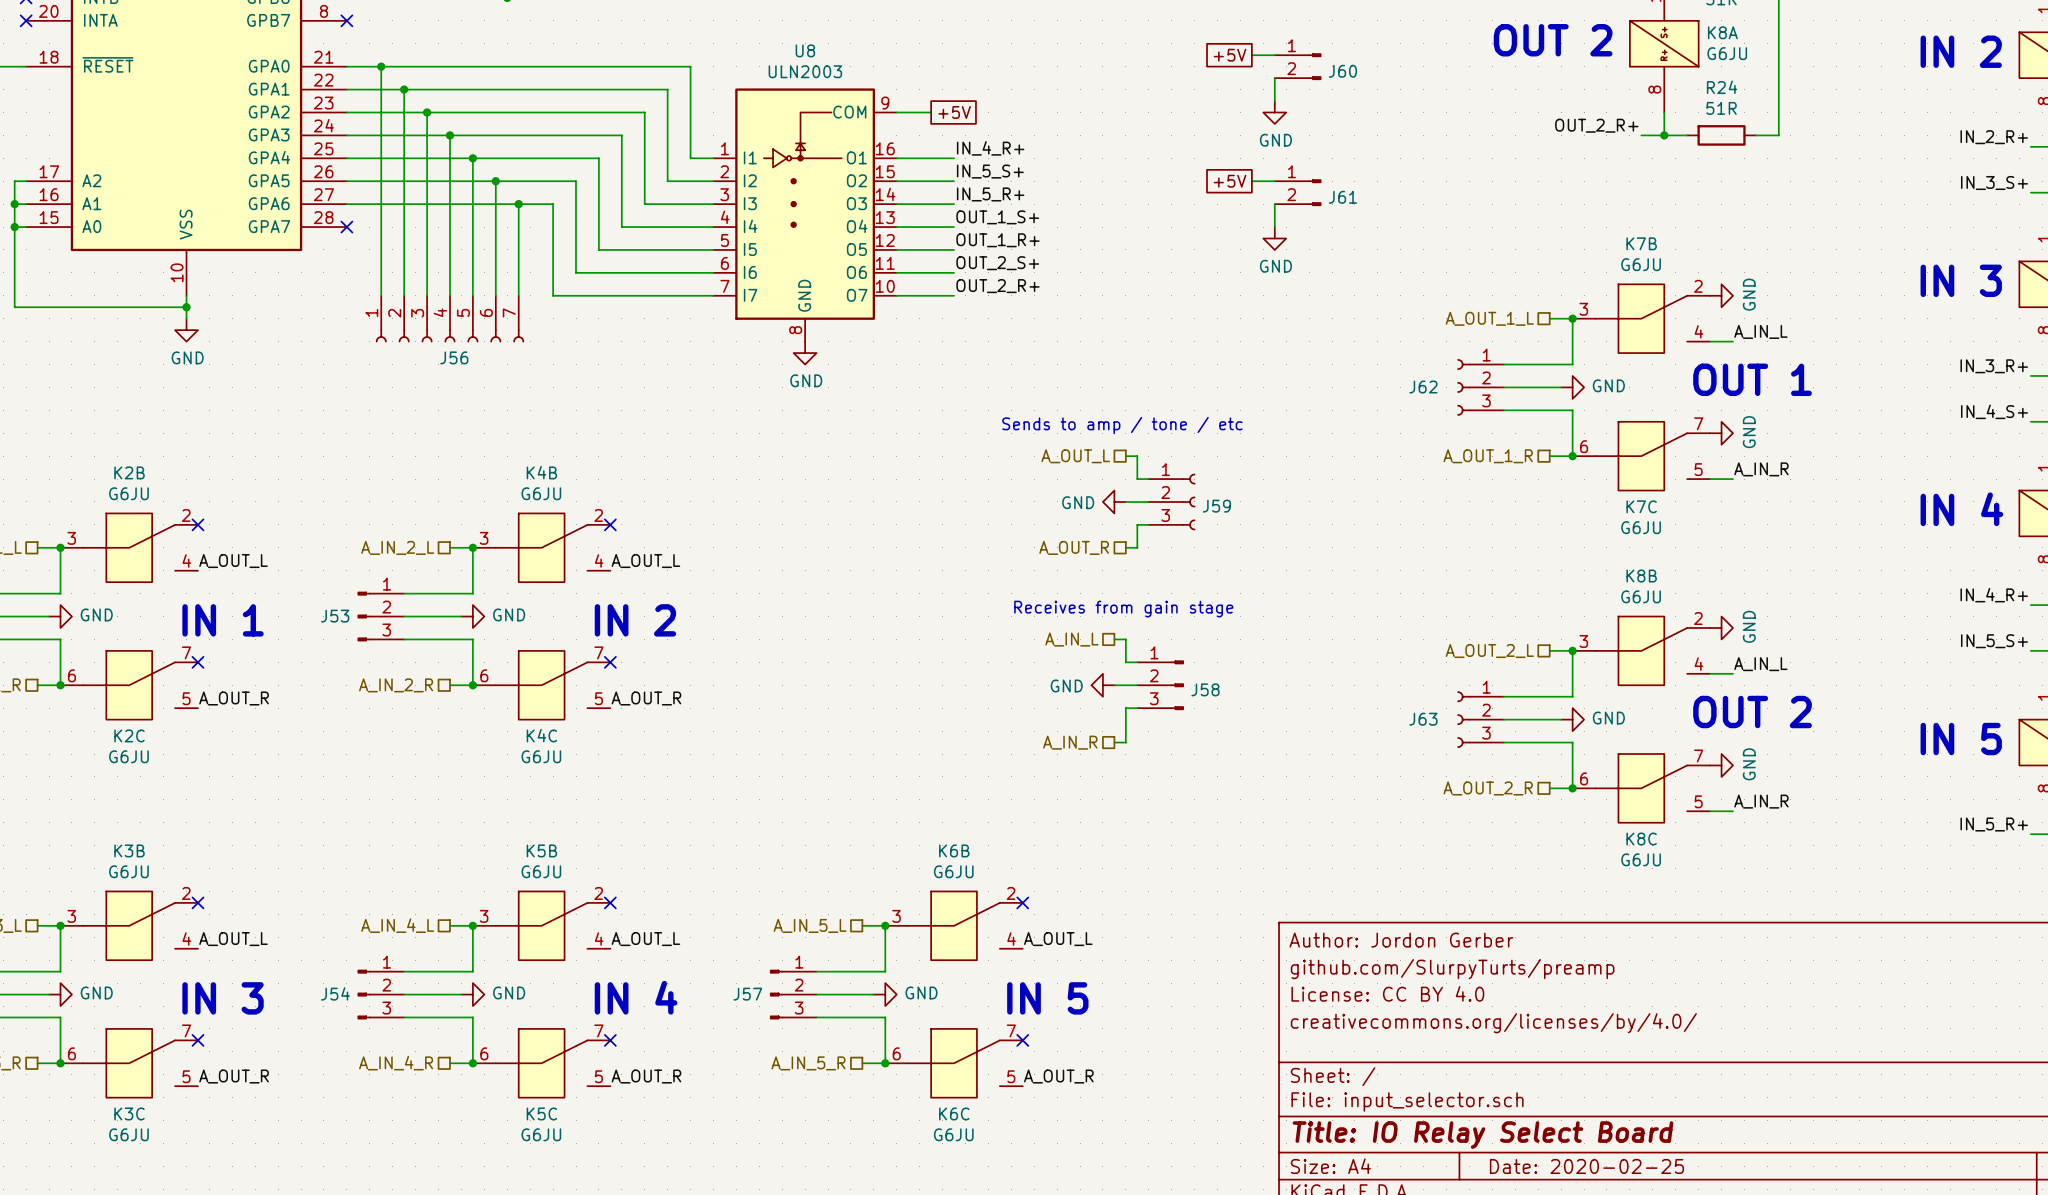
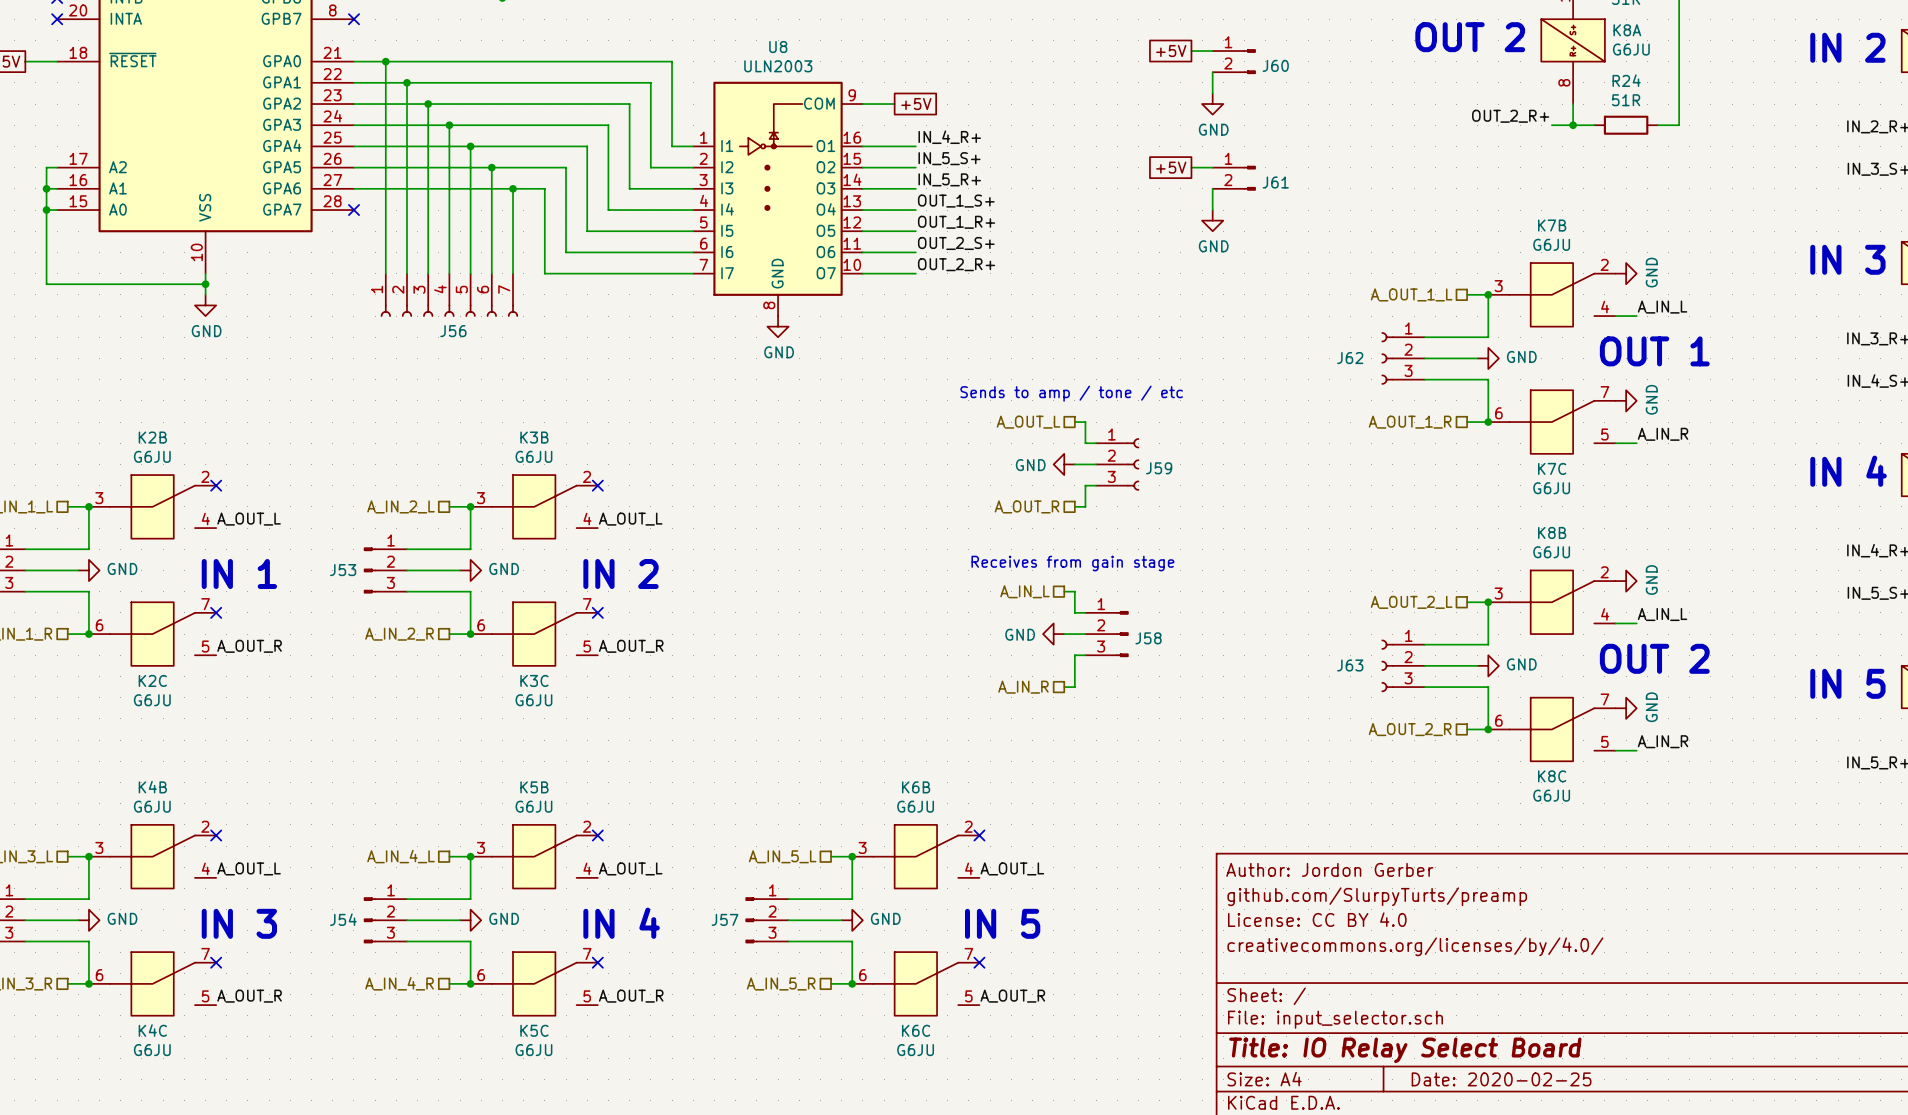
K4B name: K4B (541, 472) -> K3B (534, 437)
K4C name: K4C (541, 735) -> K3C (534, 680)
K3B name: K3B (129, 850) -> K4B (152, 787)
K3C name: K3C (129, 1113) -> K4C (152, 1030)

